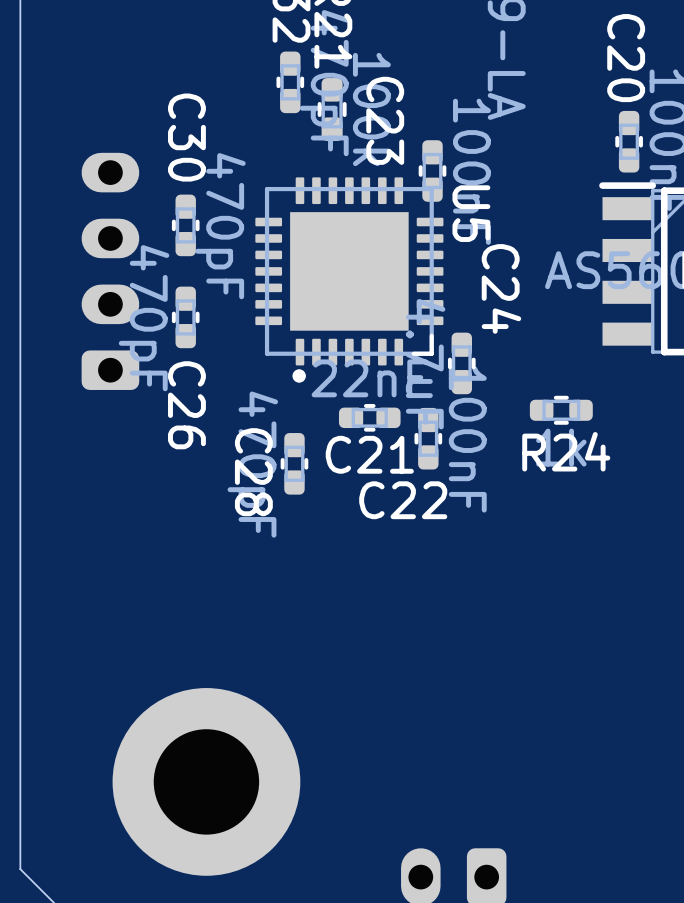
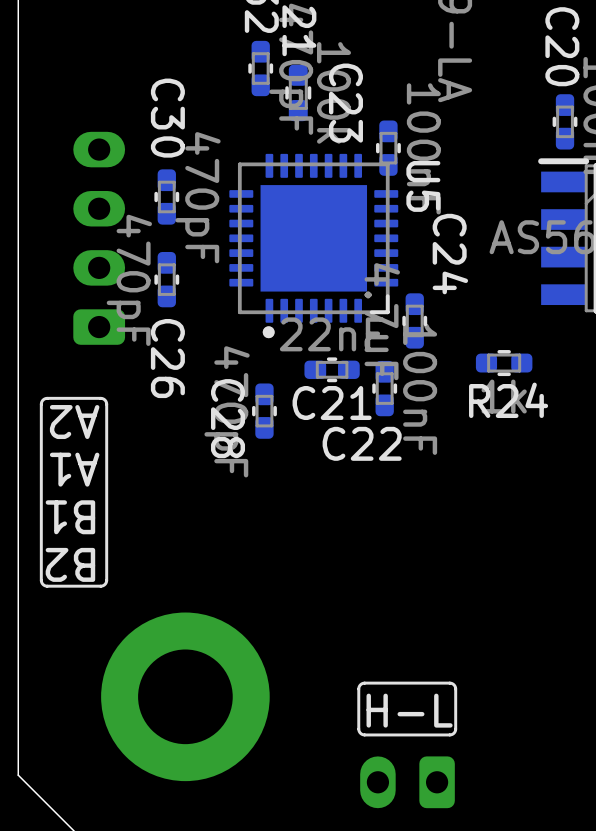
line: none -> (100, 398) (46, 398) (41, 402) (41, 580) (45, 585) (101, 586) (106, 581) (106, 404) (104, 400) (100, 398)
text: none -> A2 (74, 422)
text: none -> A1 (74, 469)
text: none -> B1 (70, 517)
text: none -> B2 (70, 564)
line: none -> (449, 683) (361, 683) (358, 689) (359, 731) (364, 734) (452, 734) (455, 729) (455, 689) (453, 684) (449, 683)
text: none -> H-L (409, 710)

